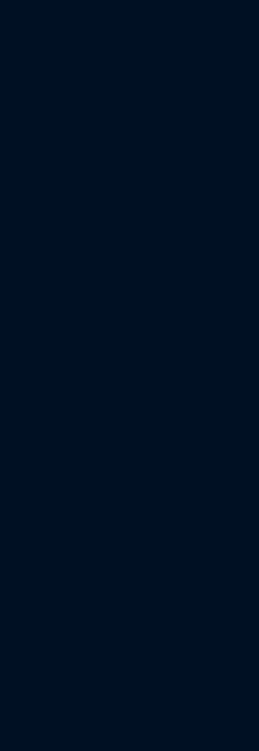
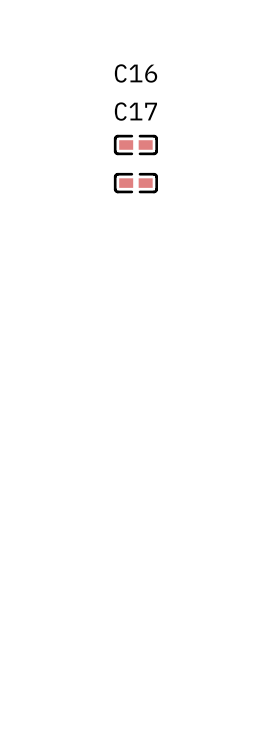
C16: none -> (135, 144)
C17: none -> (135, 183)

